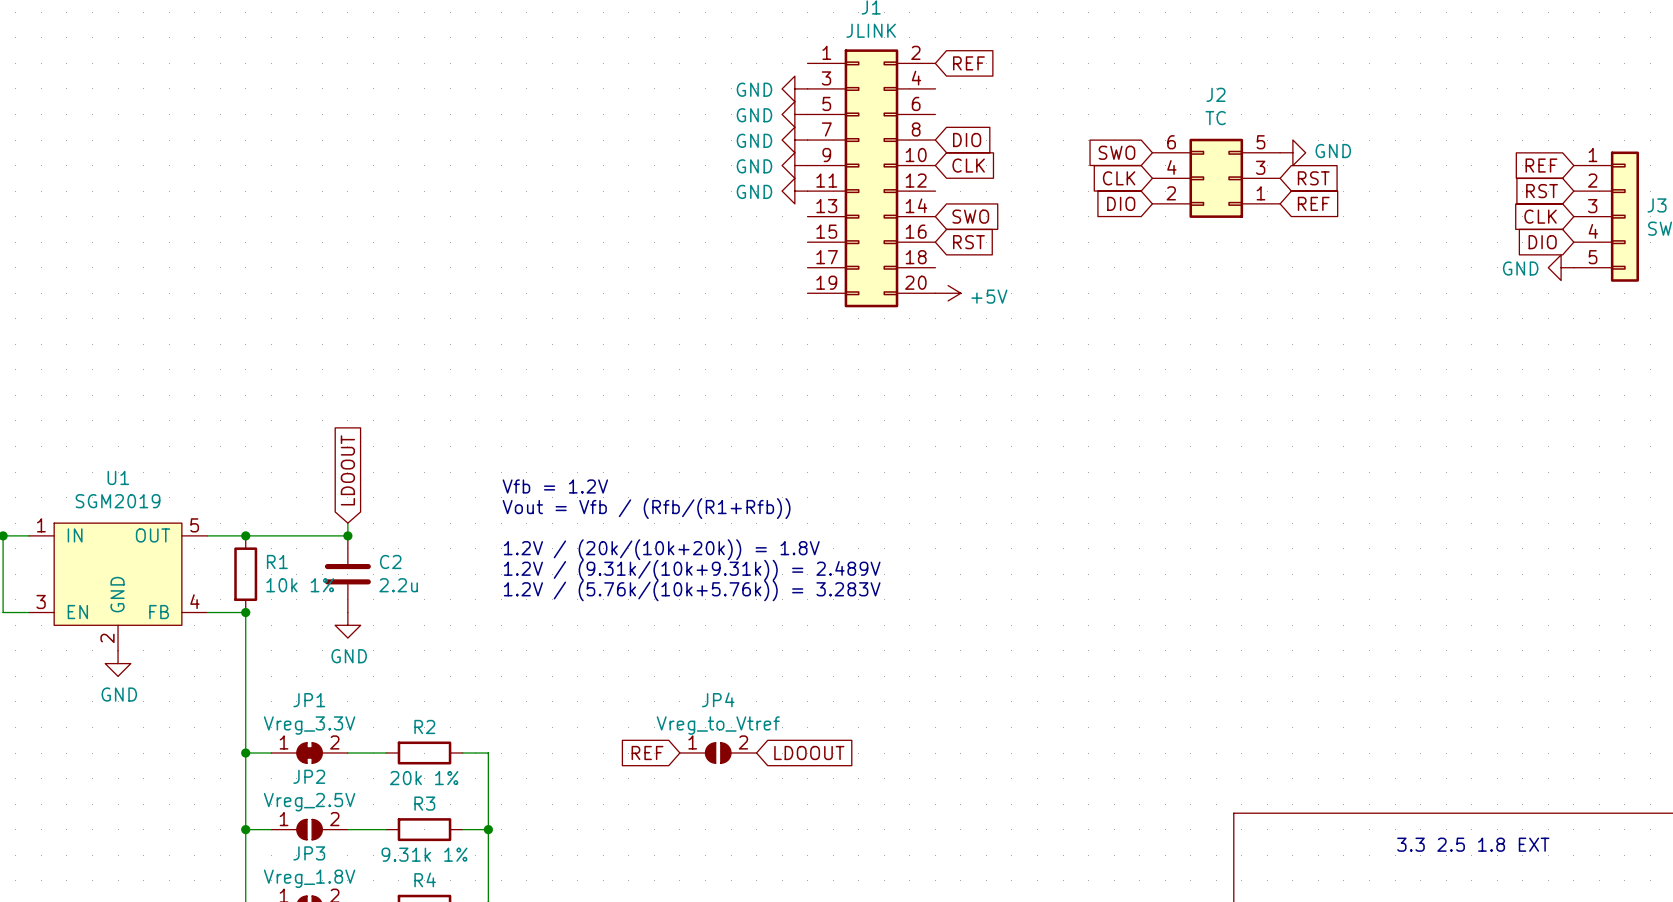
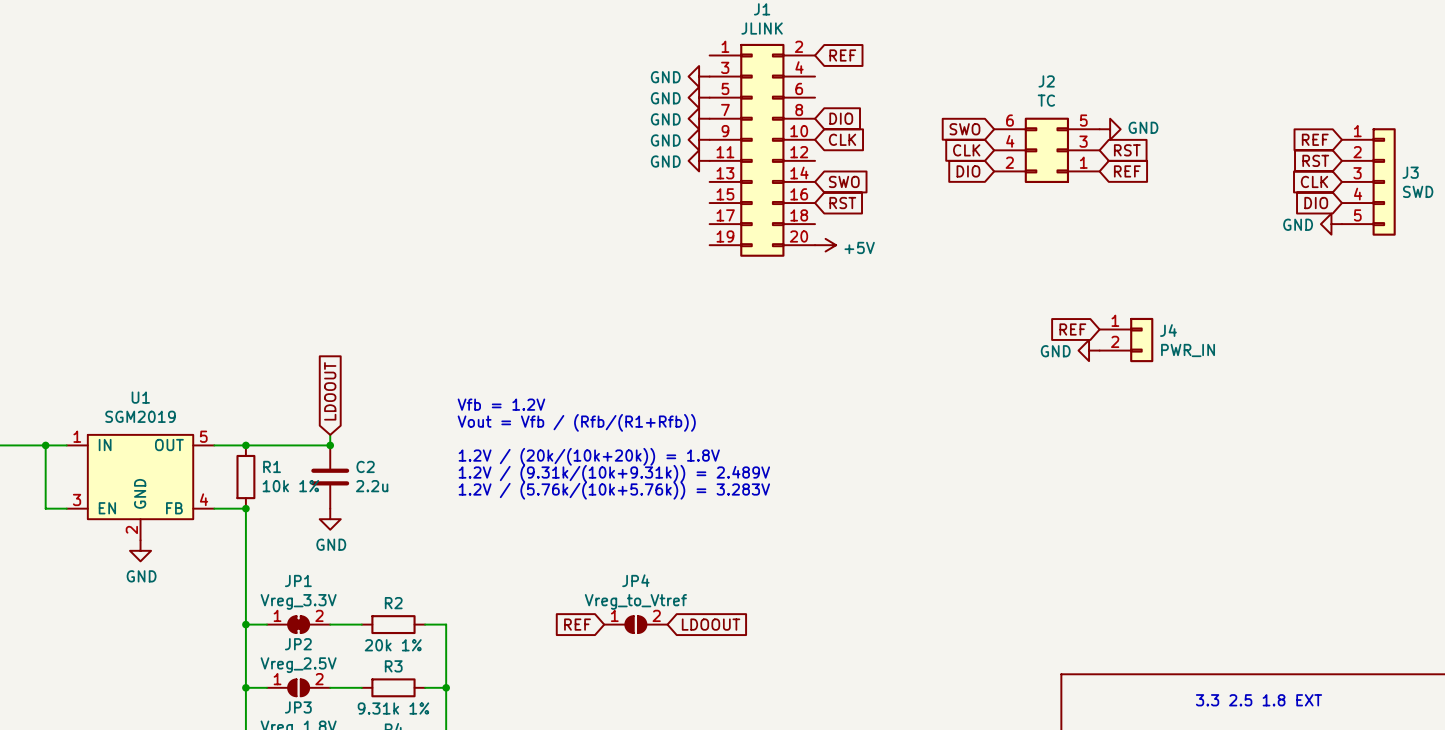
global label: none -> REF (1072, 329)
J4: none -> PWR_IN (1126, 340)
power symbol: none -> GND (1089, 350)

